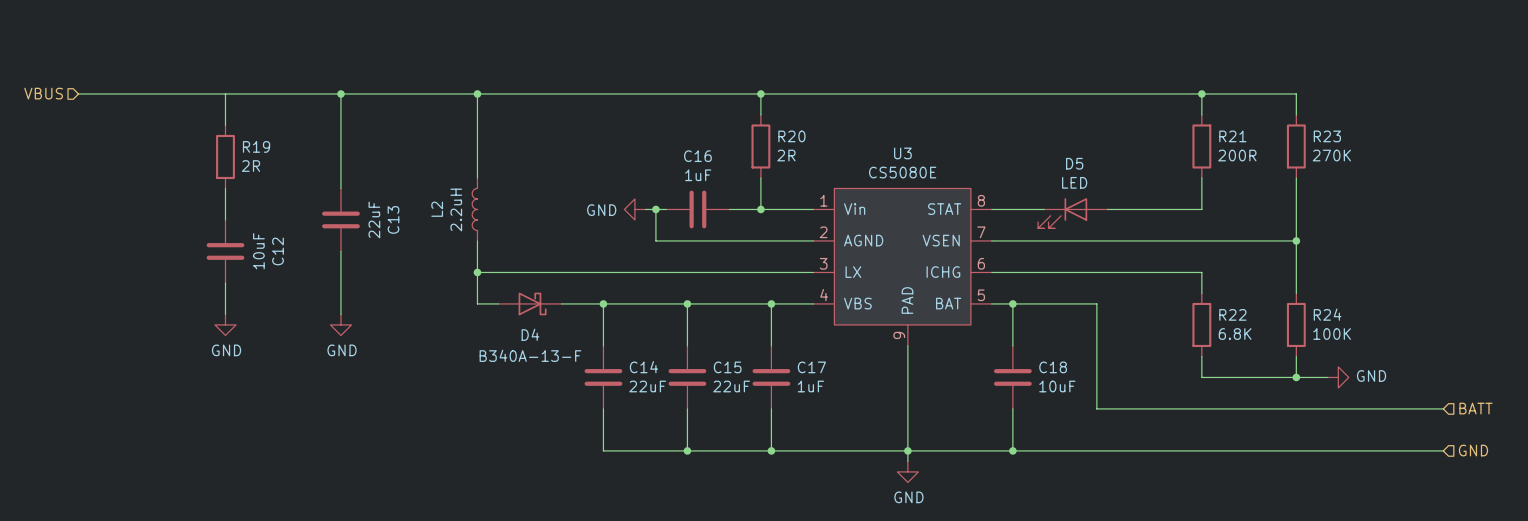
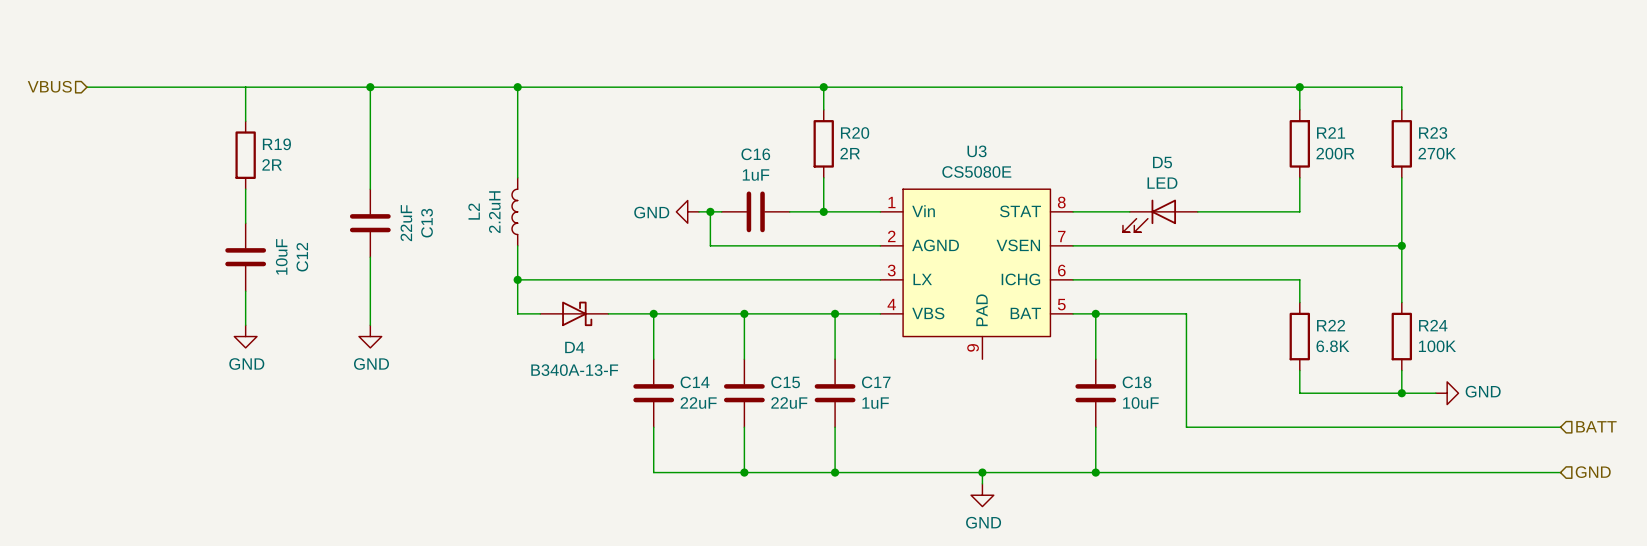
wire: (907, 345) (907, 450) -> none

